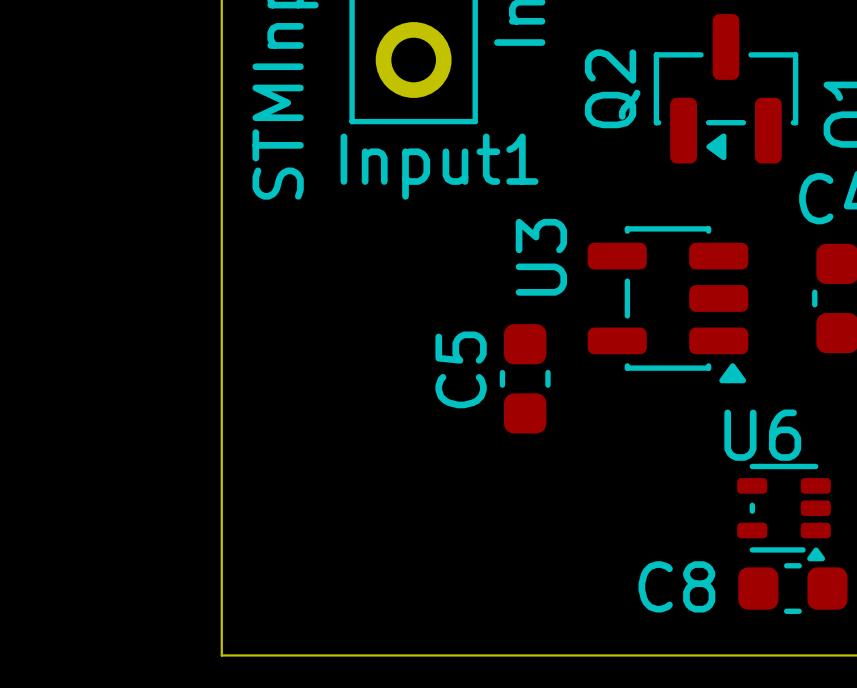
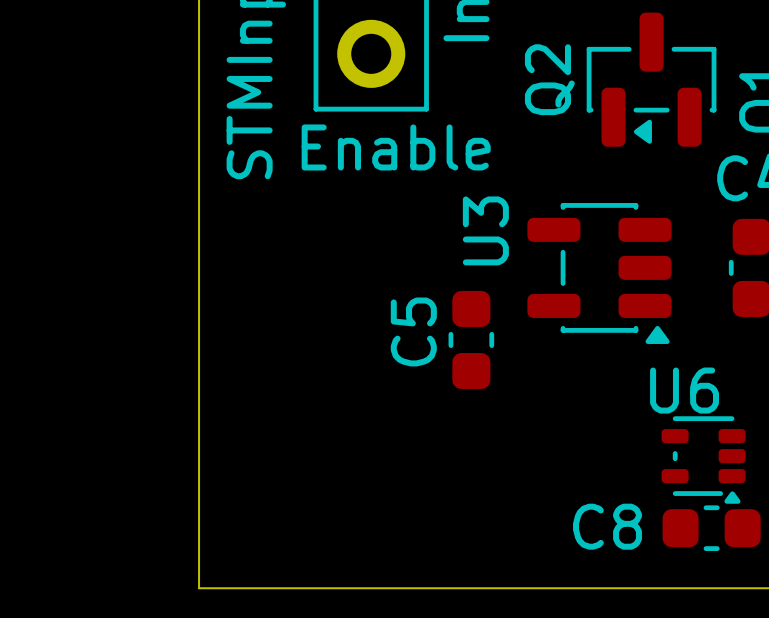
text: Input1 (439, 166) -> Enable (396, 147)

